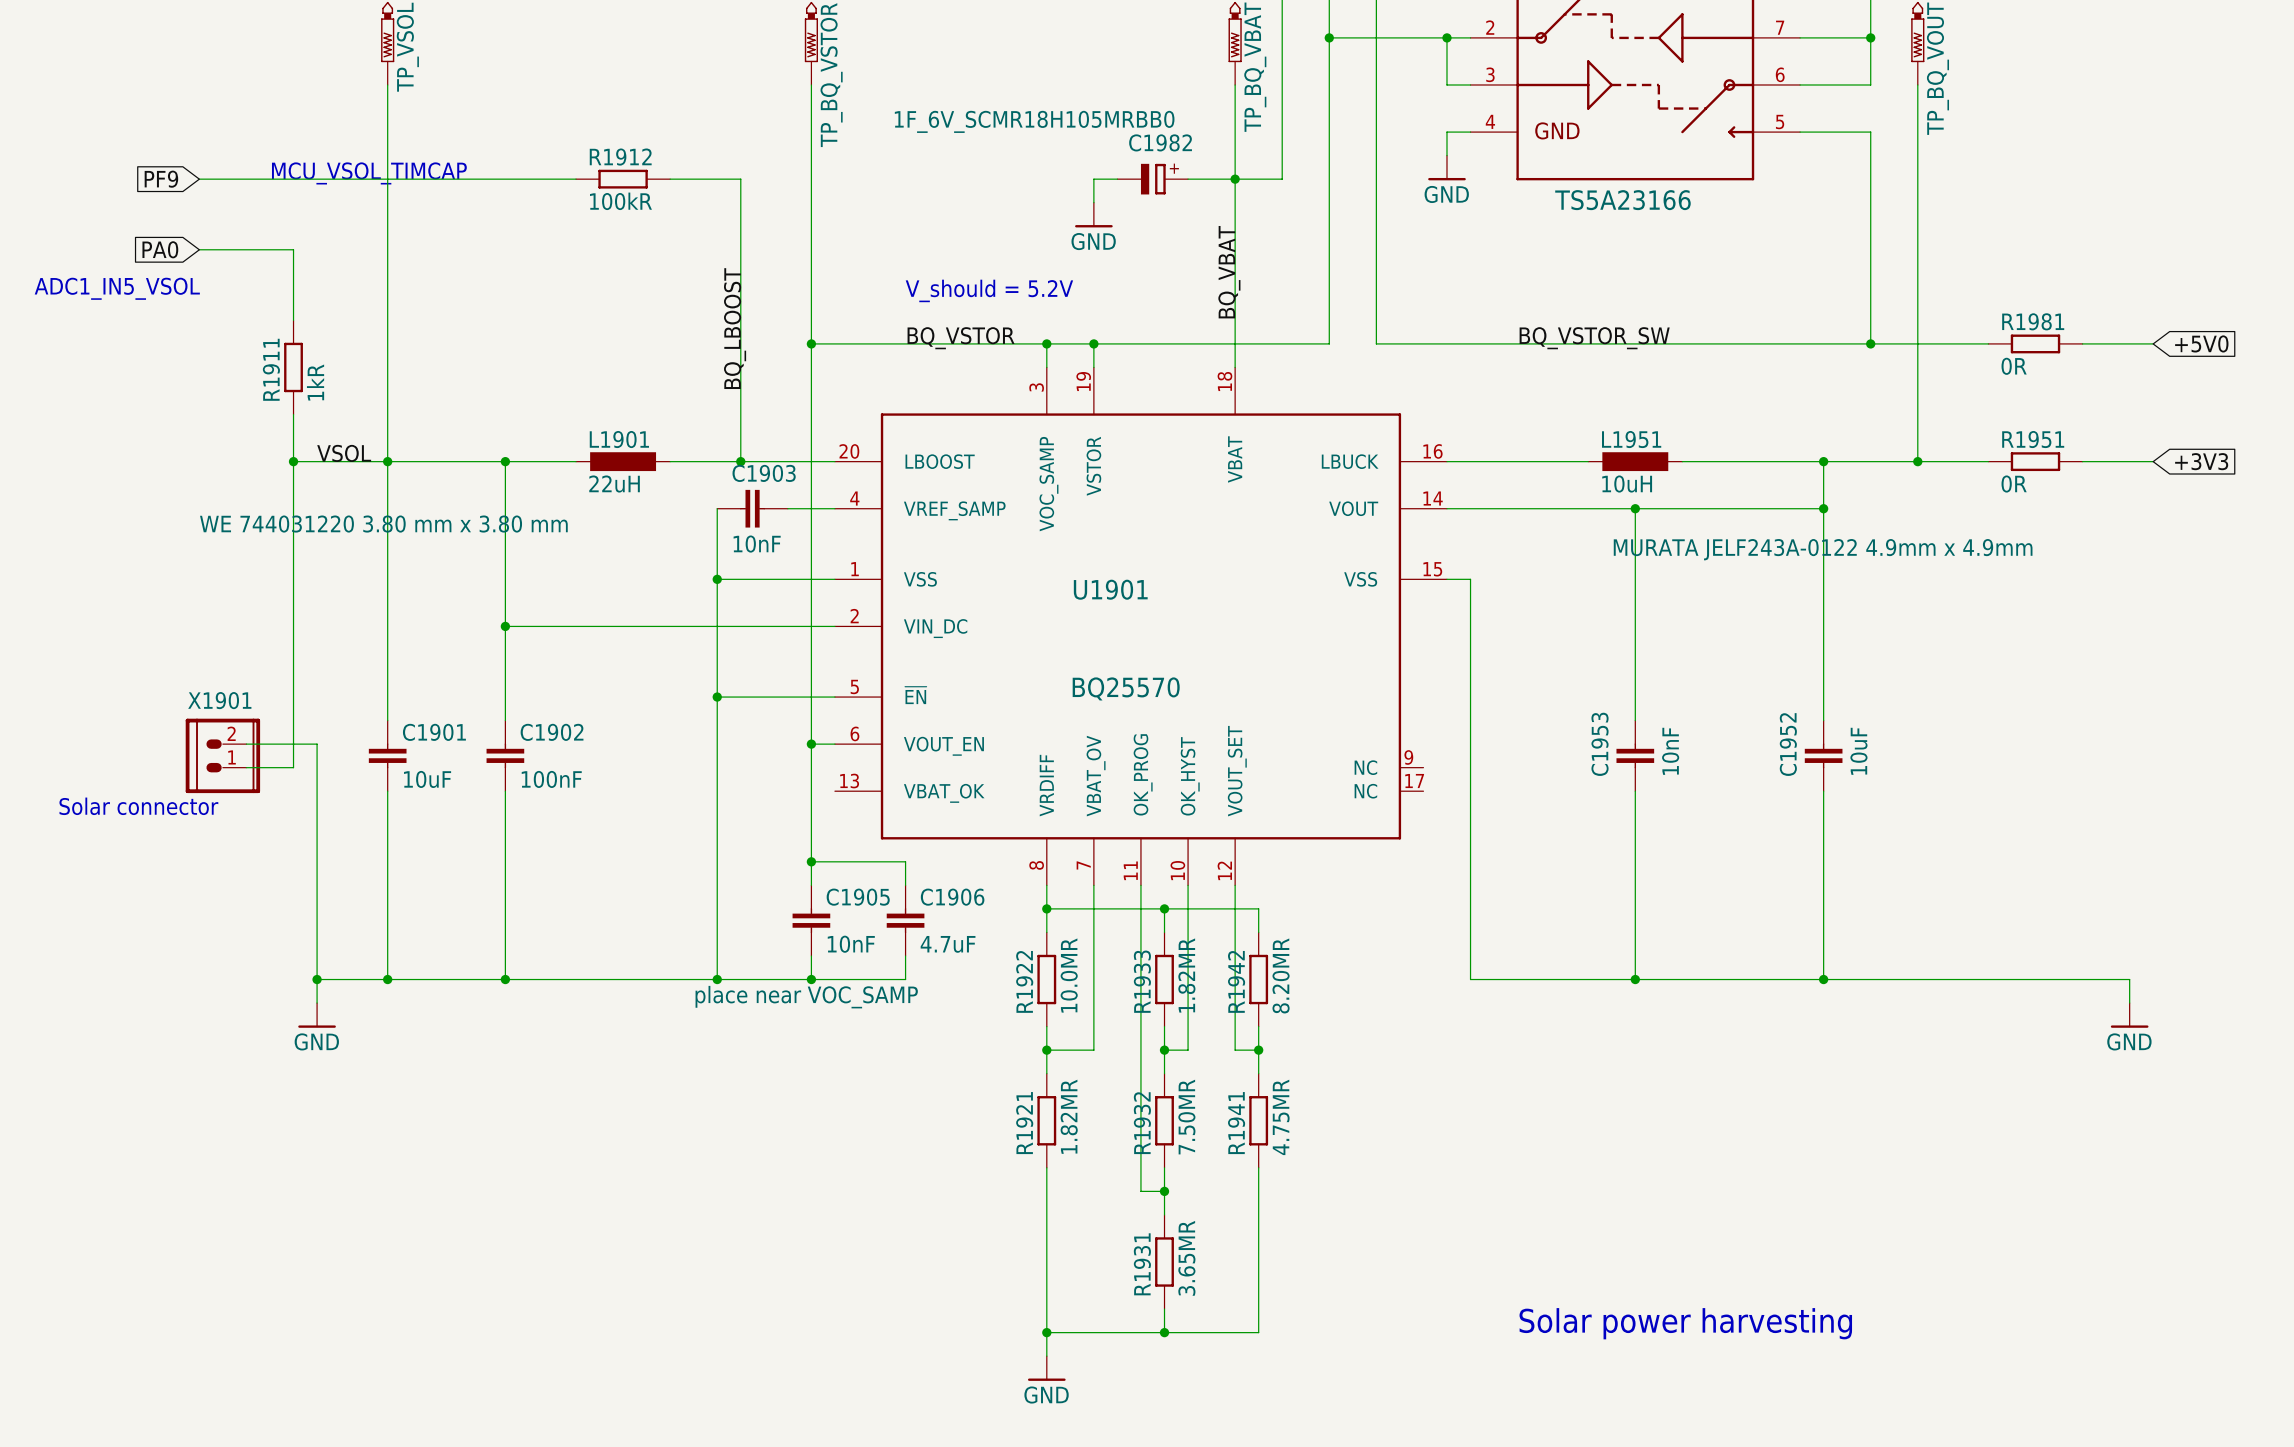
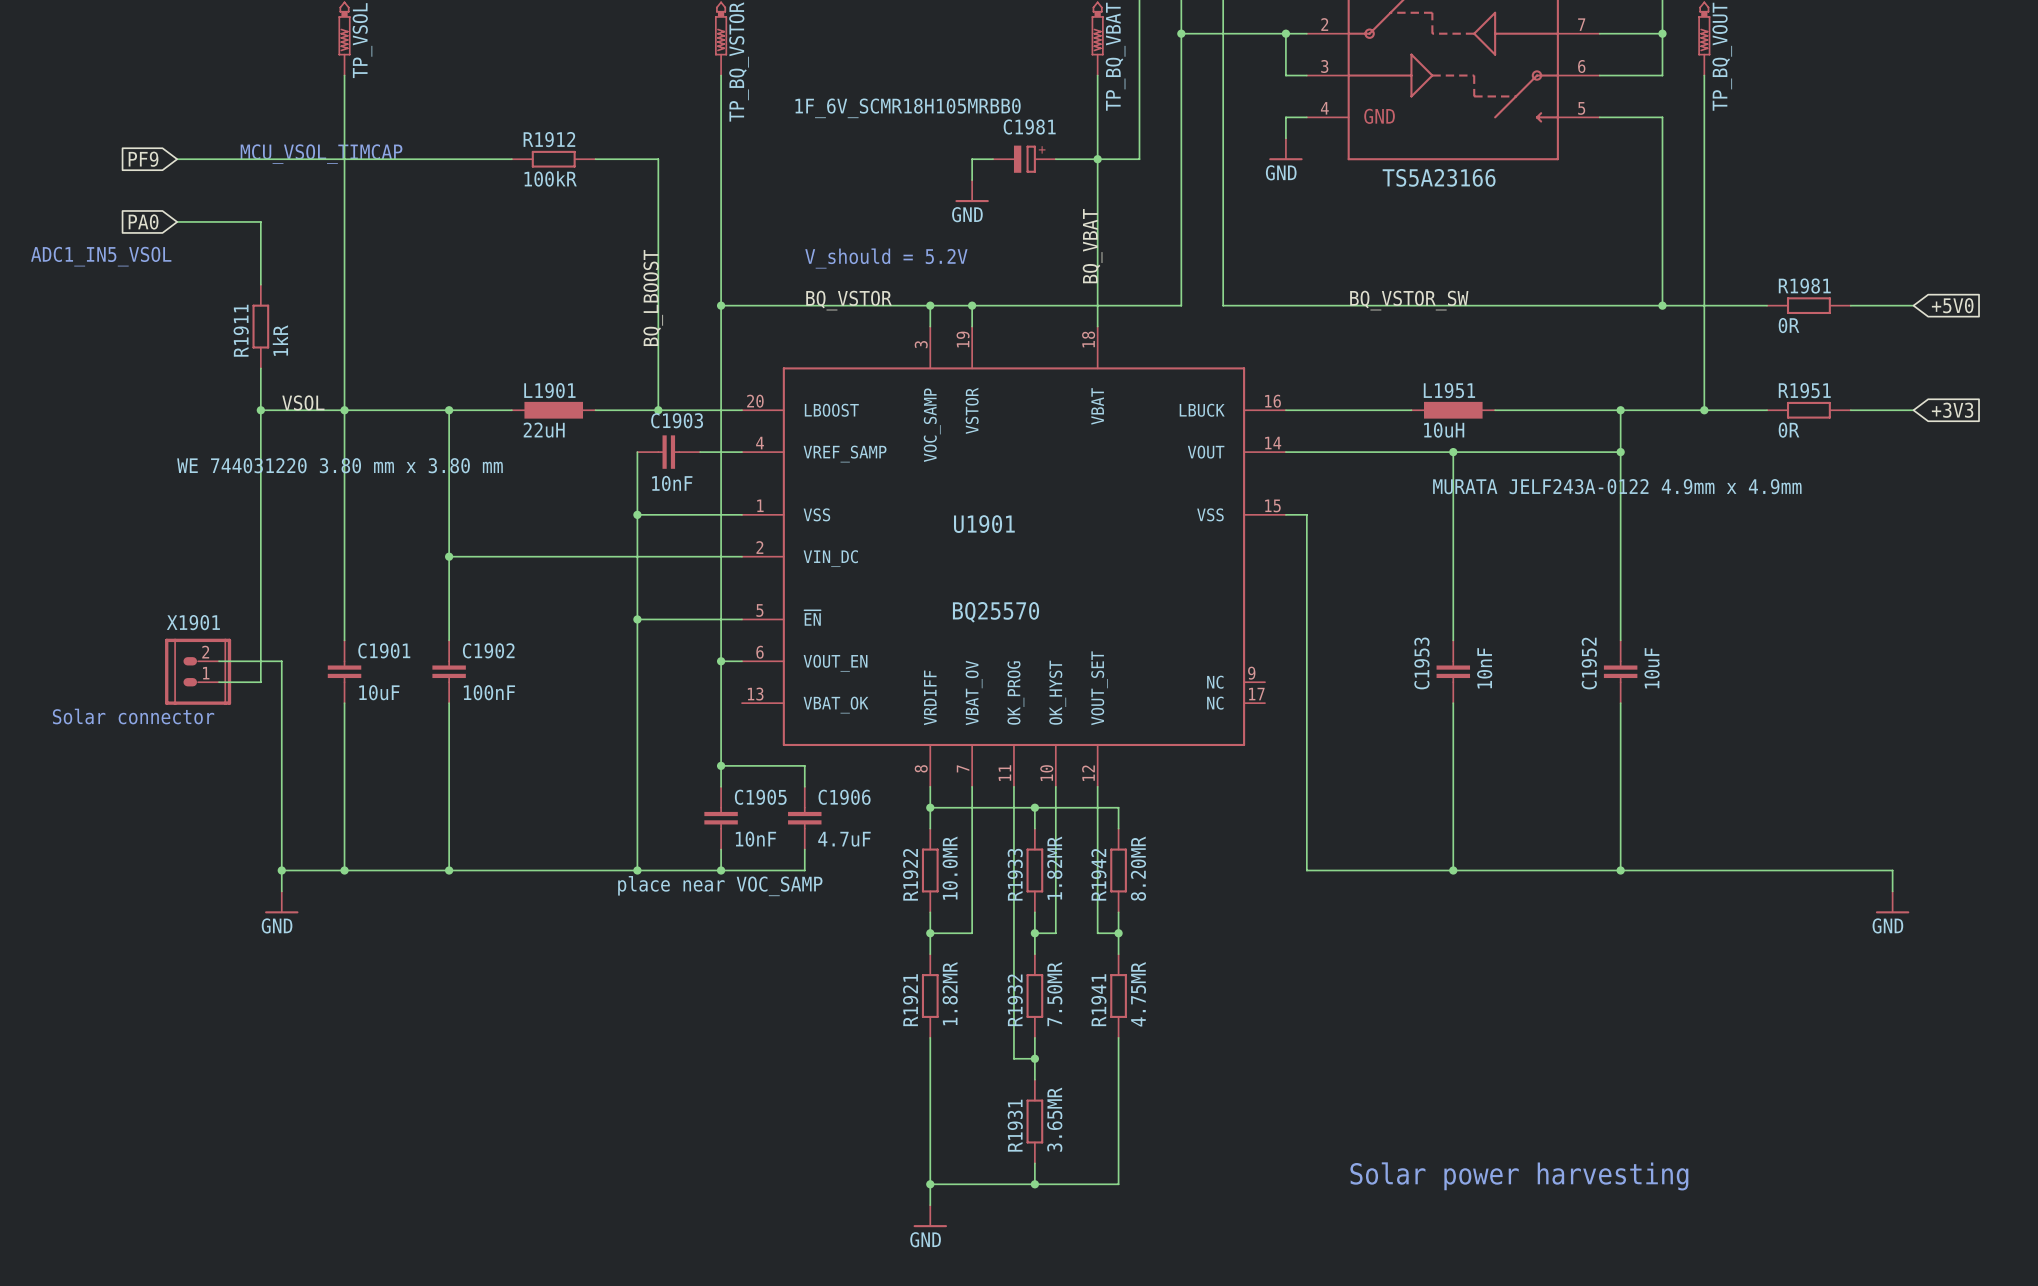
C1982 name: C1982 (1160, 142) -> C1981 (1029, 127)

